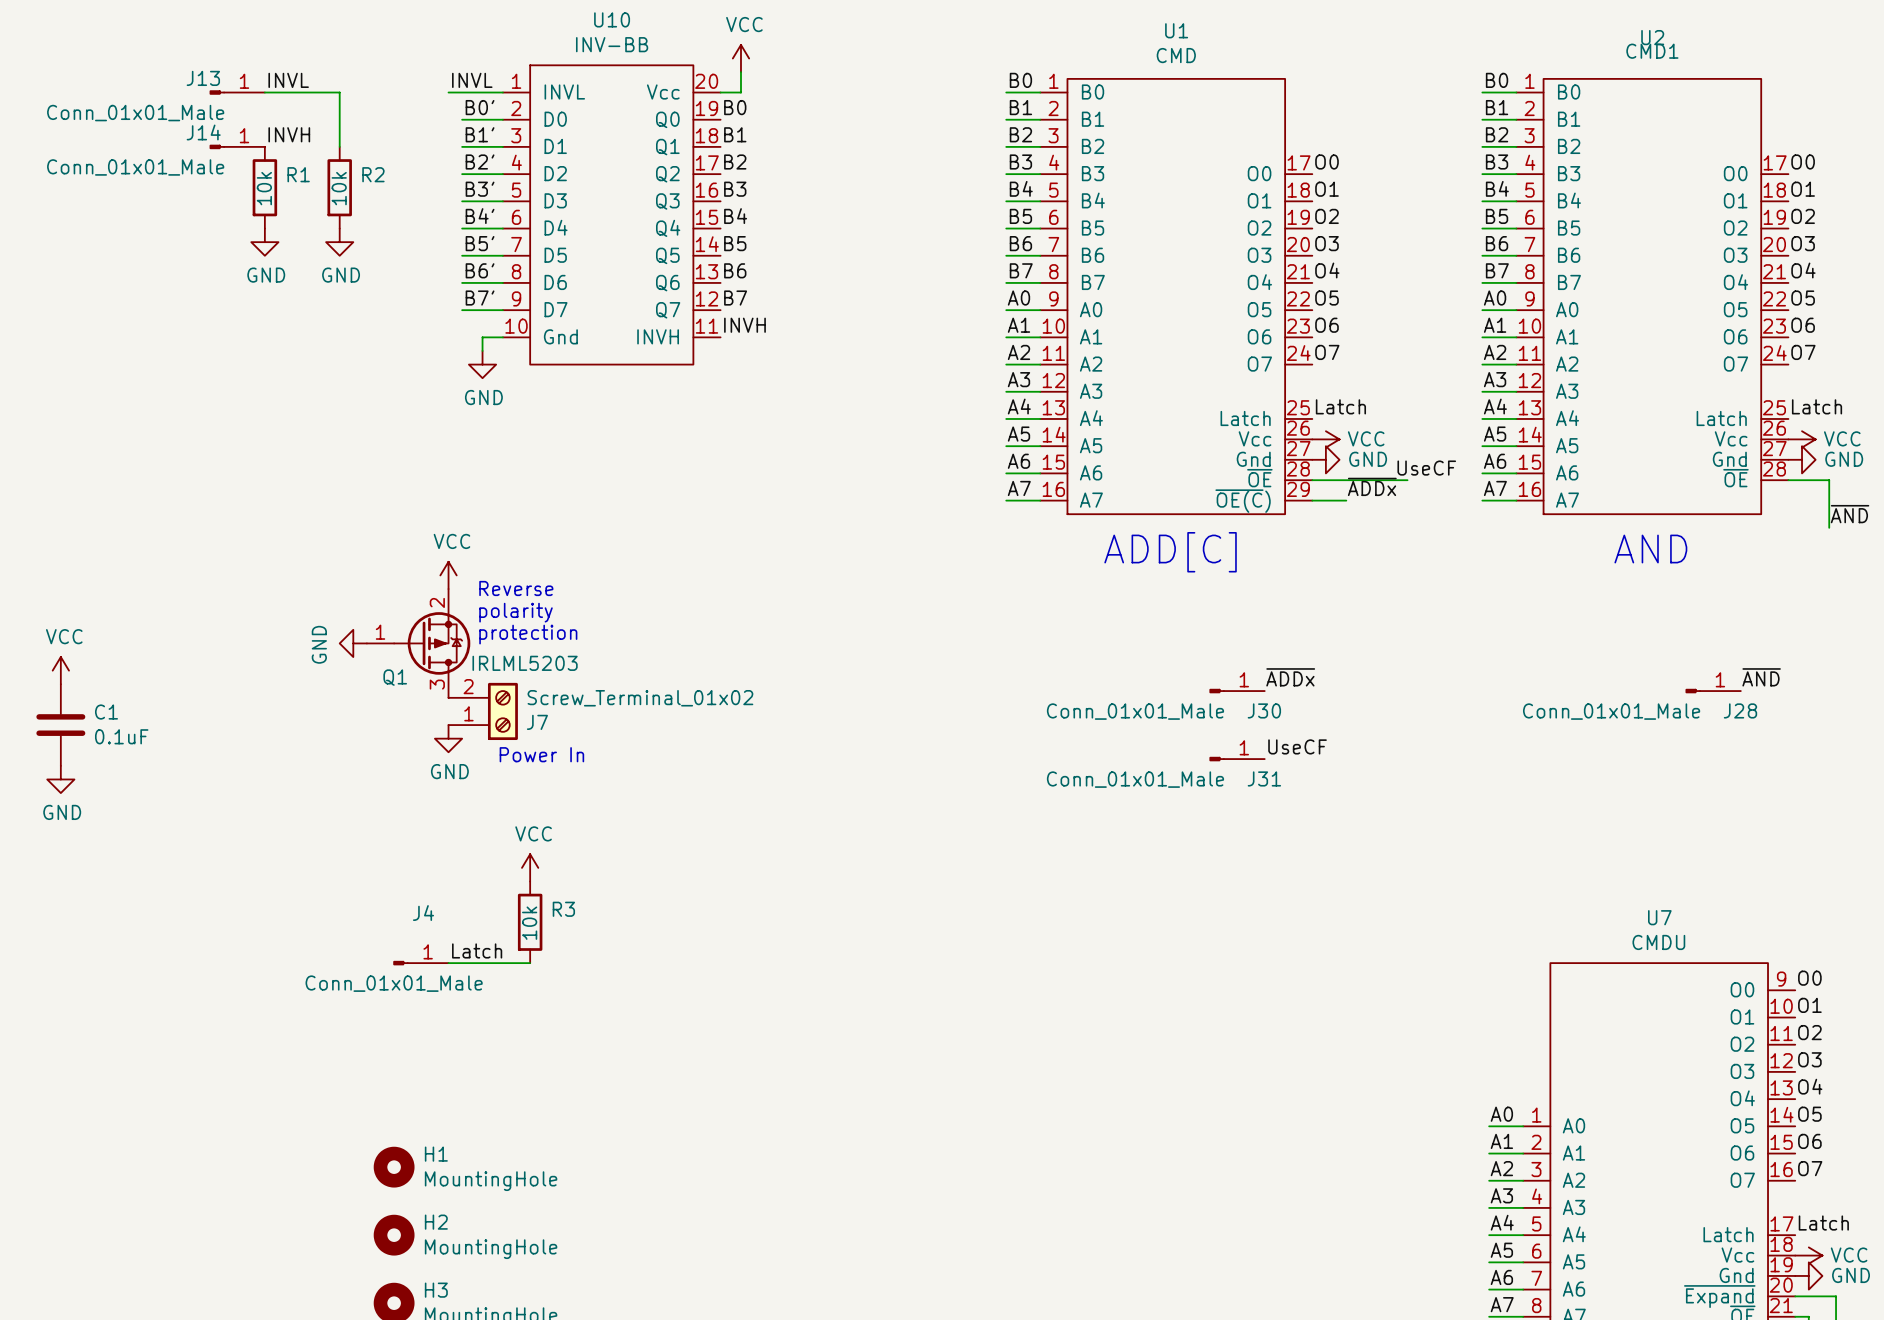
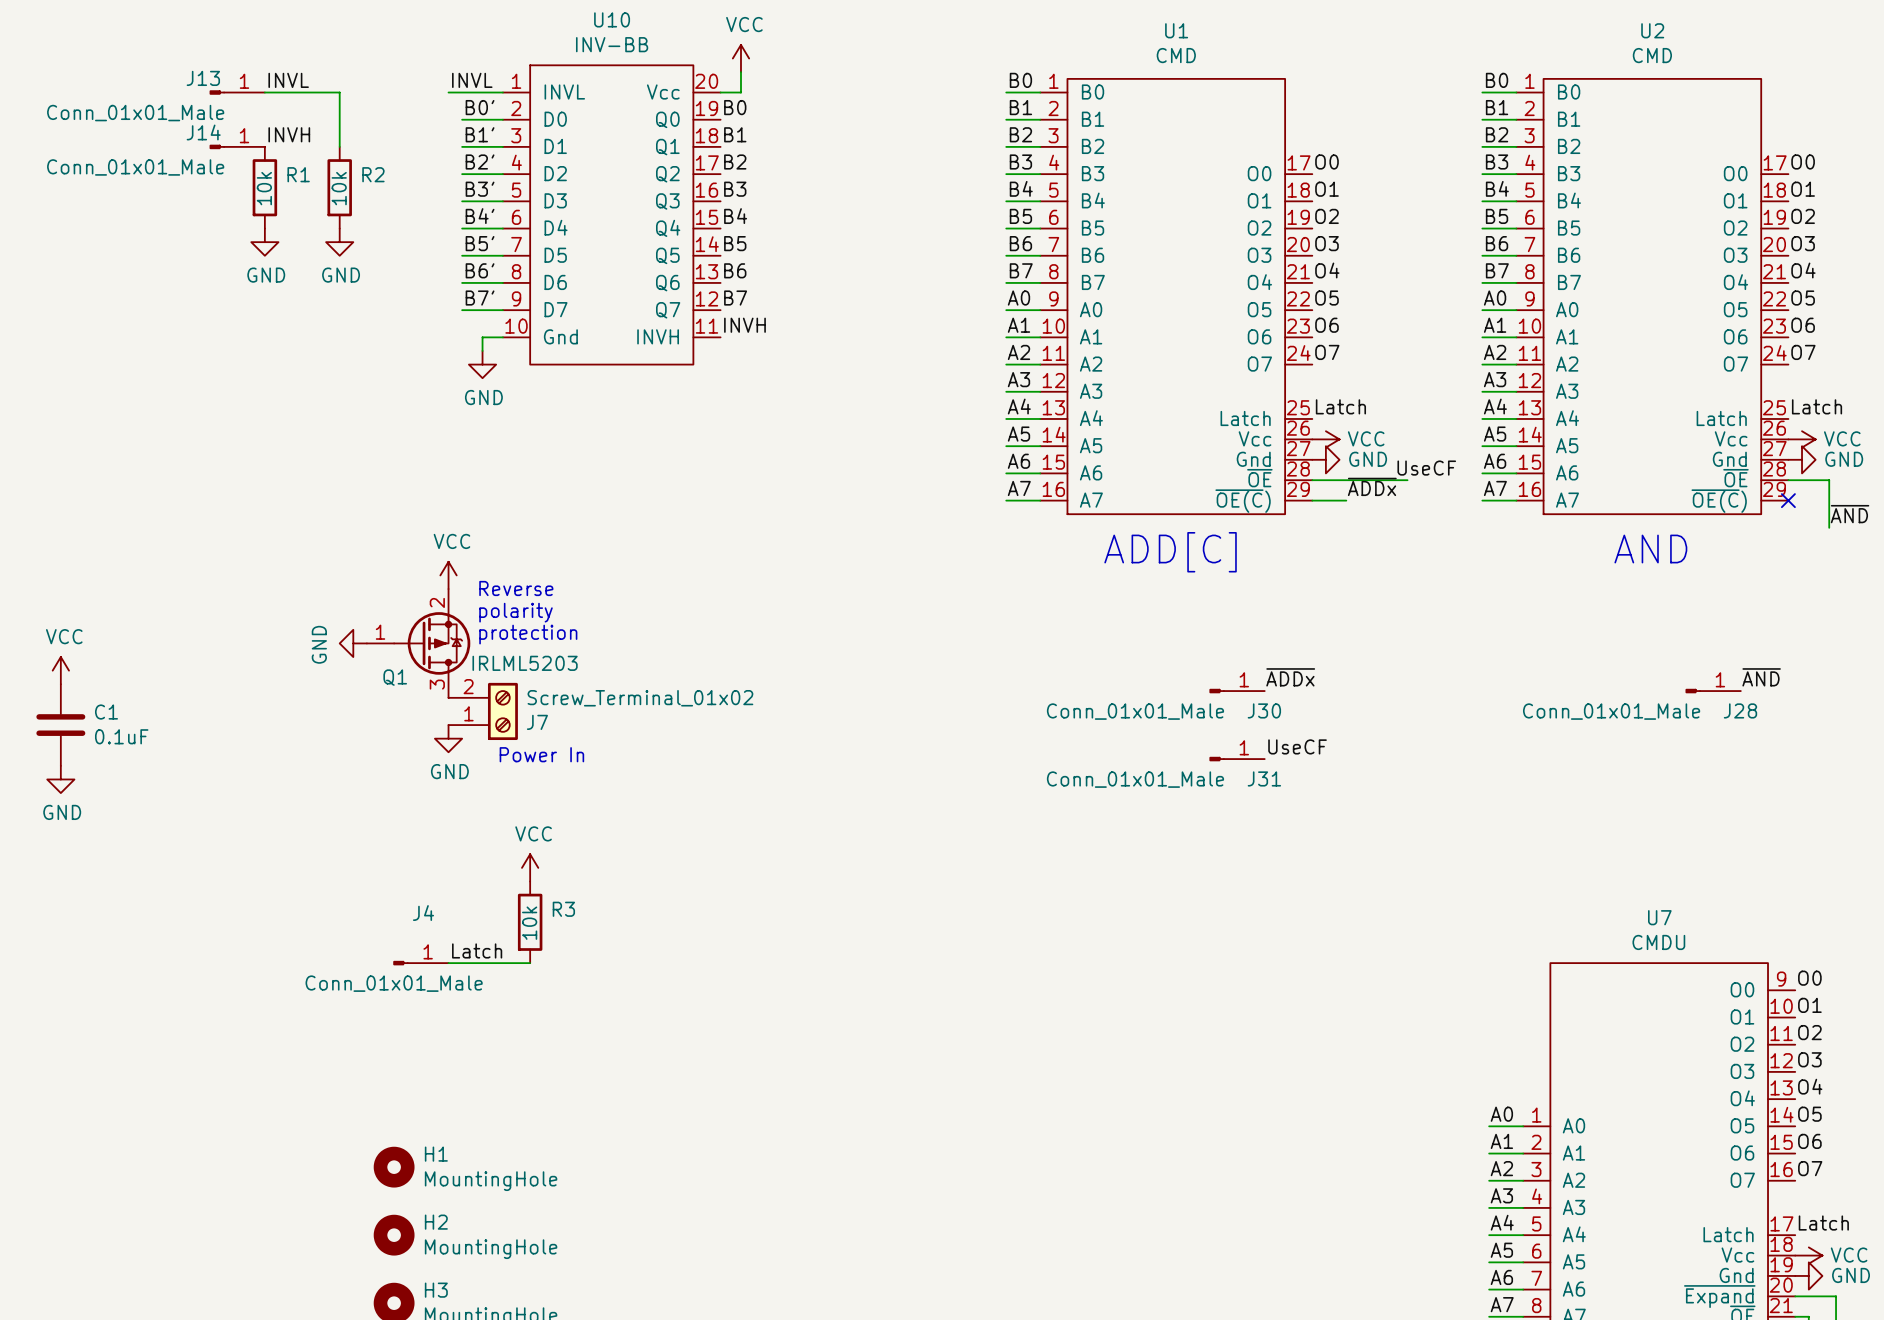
U2 value: CMD1 (1652, 51) -> CMD (1652, 55)
U2 symbol: [1516, 78, 1789, 515] -> [1516, 78, 1789, 515]
no-connect mark: none -> (1788, 500)

